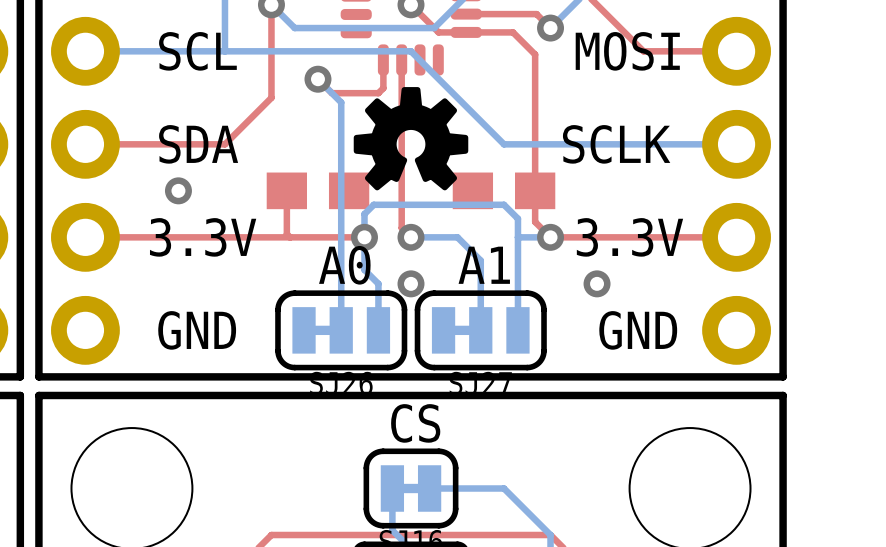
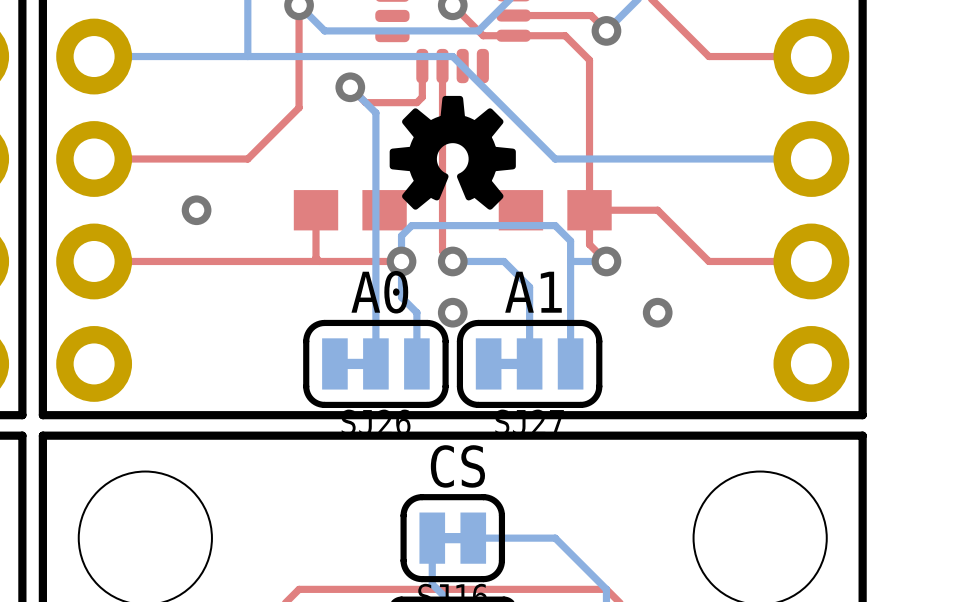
text: SCL (197, 51) -> none
text: MOSI (627, 51) -> none
text: SDA (198, 144) -> none
text: SCLK (616, 144) -> none
text: 3.3V (203, 237) -> none
text: 3.3V (629, 237) -> none
top track: (643, 237) (550, 237) -> (708, 261) (657, 210) (589, 210)
text: GND (197, 330) -> none
text: GND (638, 330) -> none

